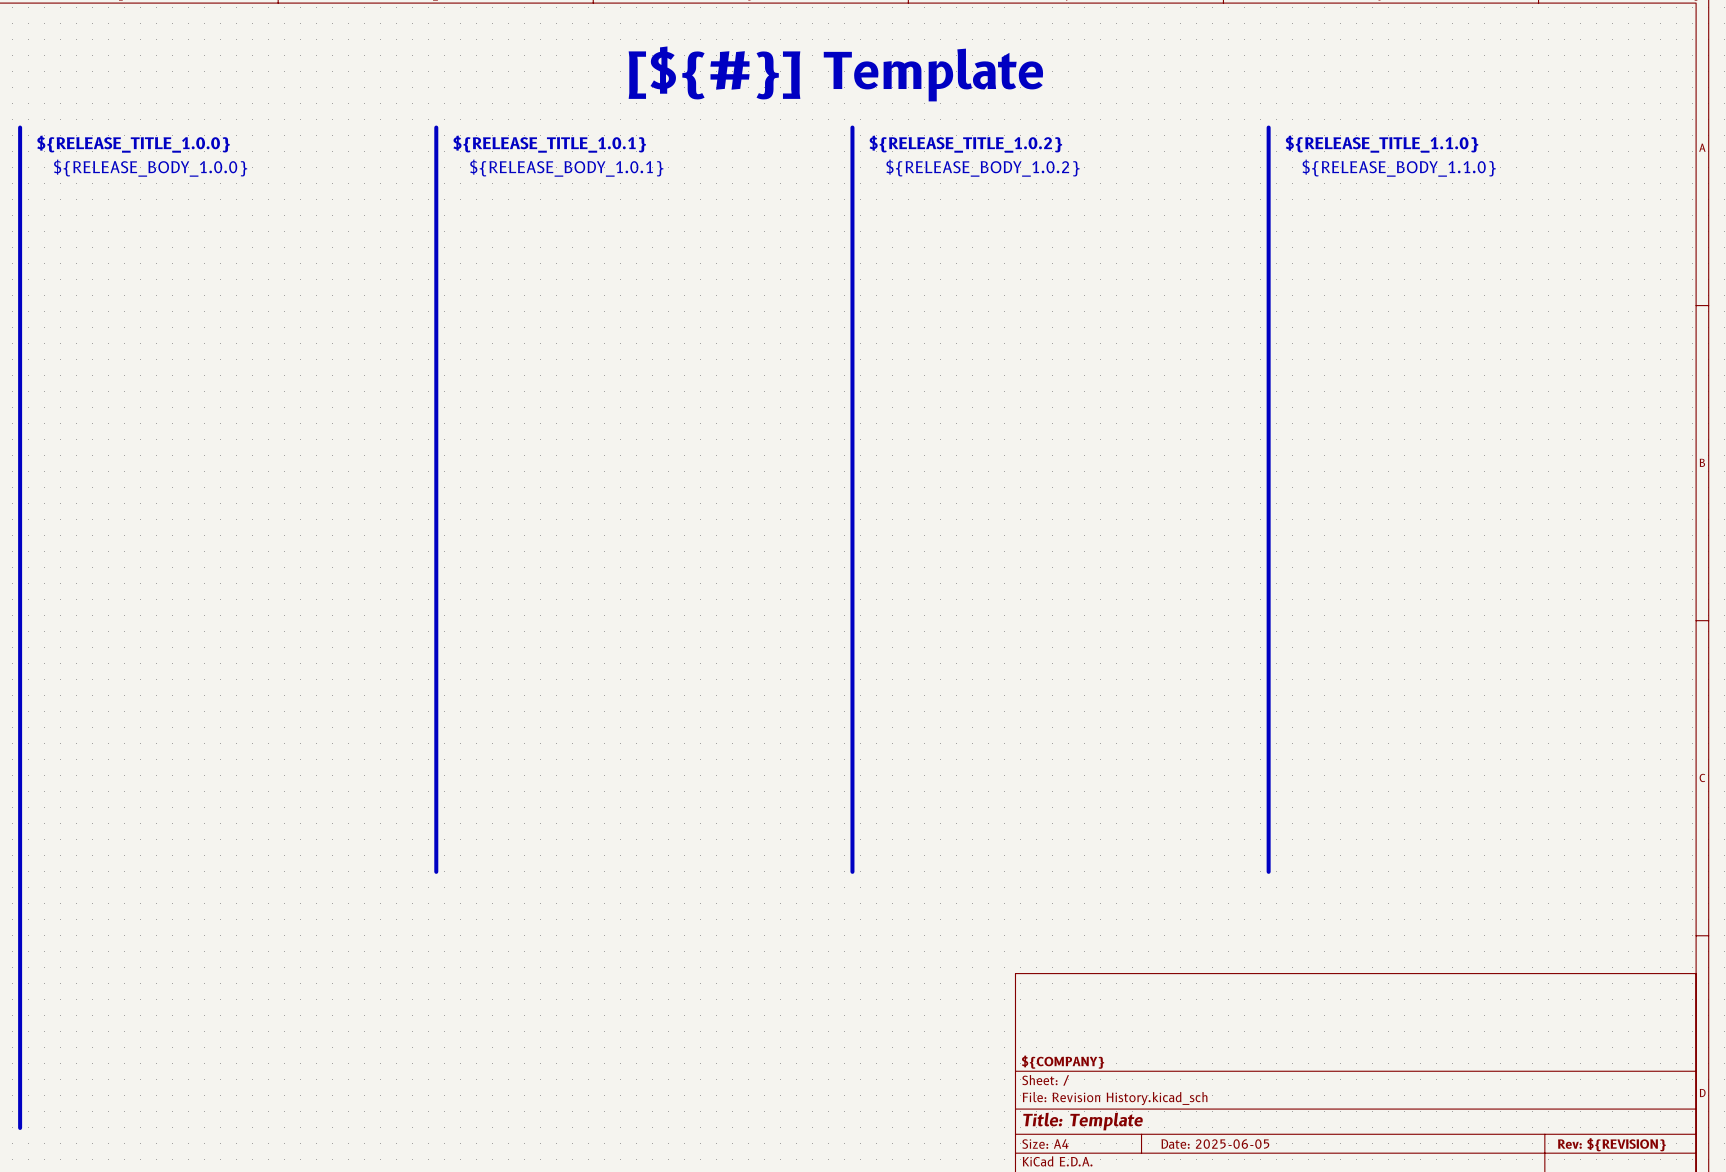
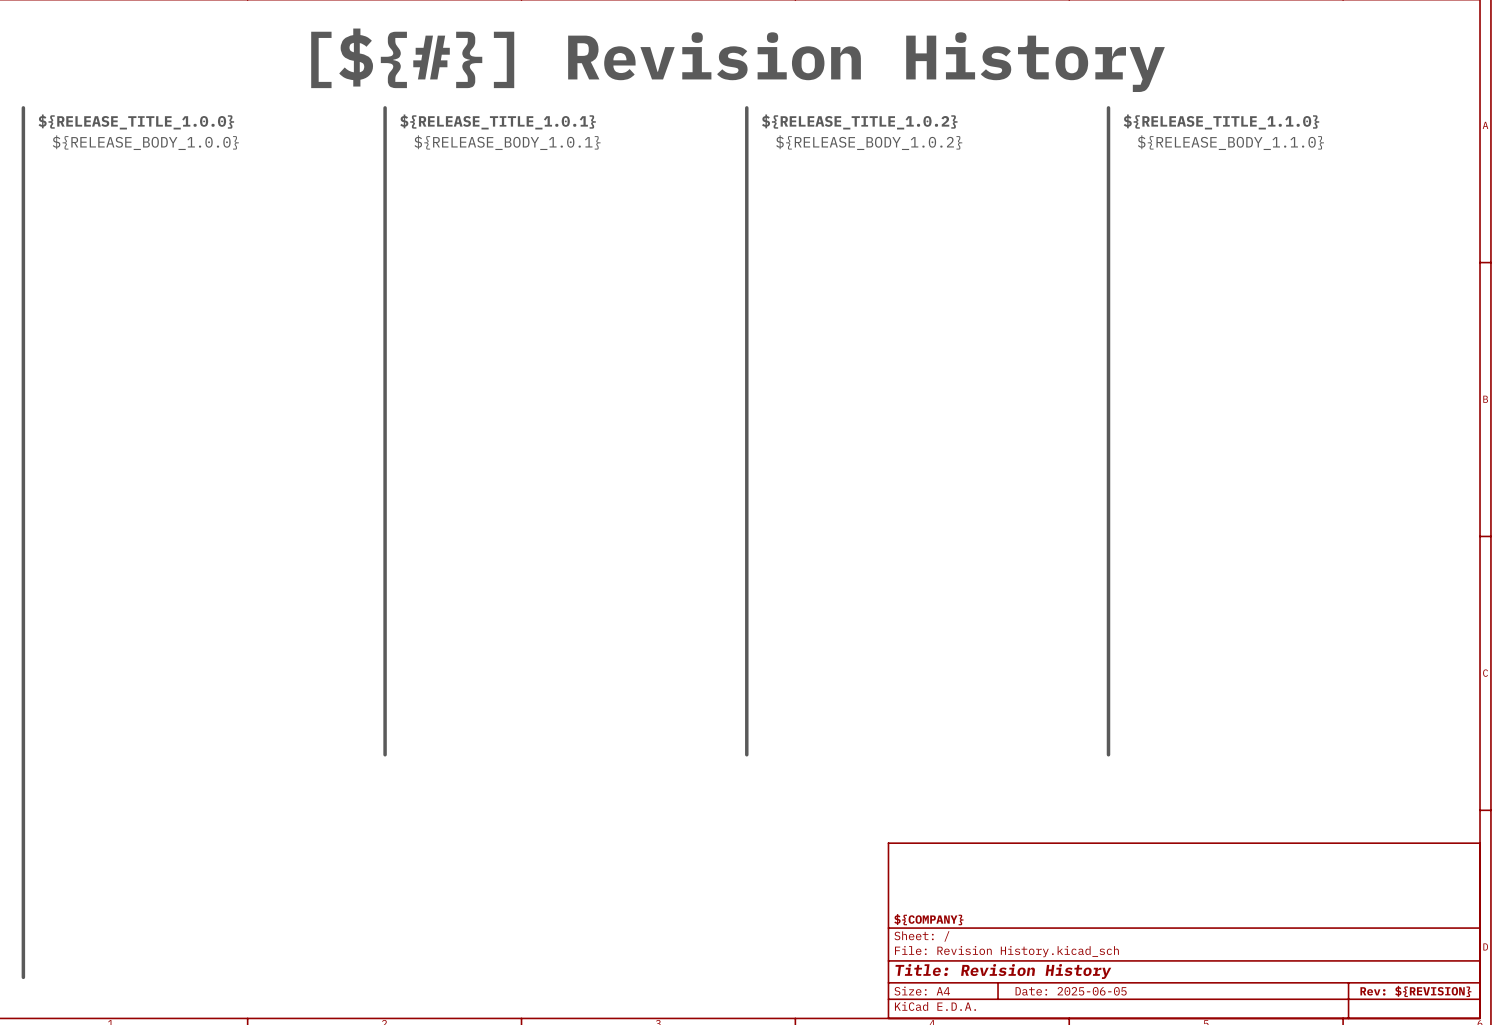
text: [${#}] Template (835, 73) -> [${#}] Revision History (738, 60)
title block: Title: Template (1083, 1121) -> Title: Revision History (1003, 971)

